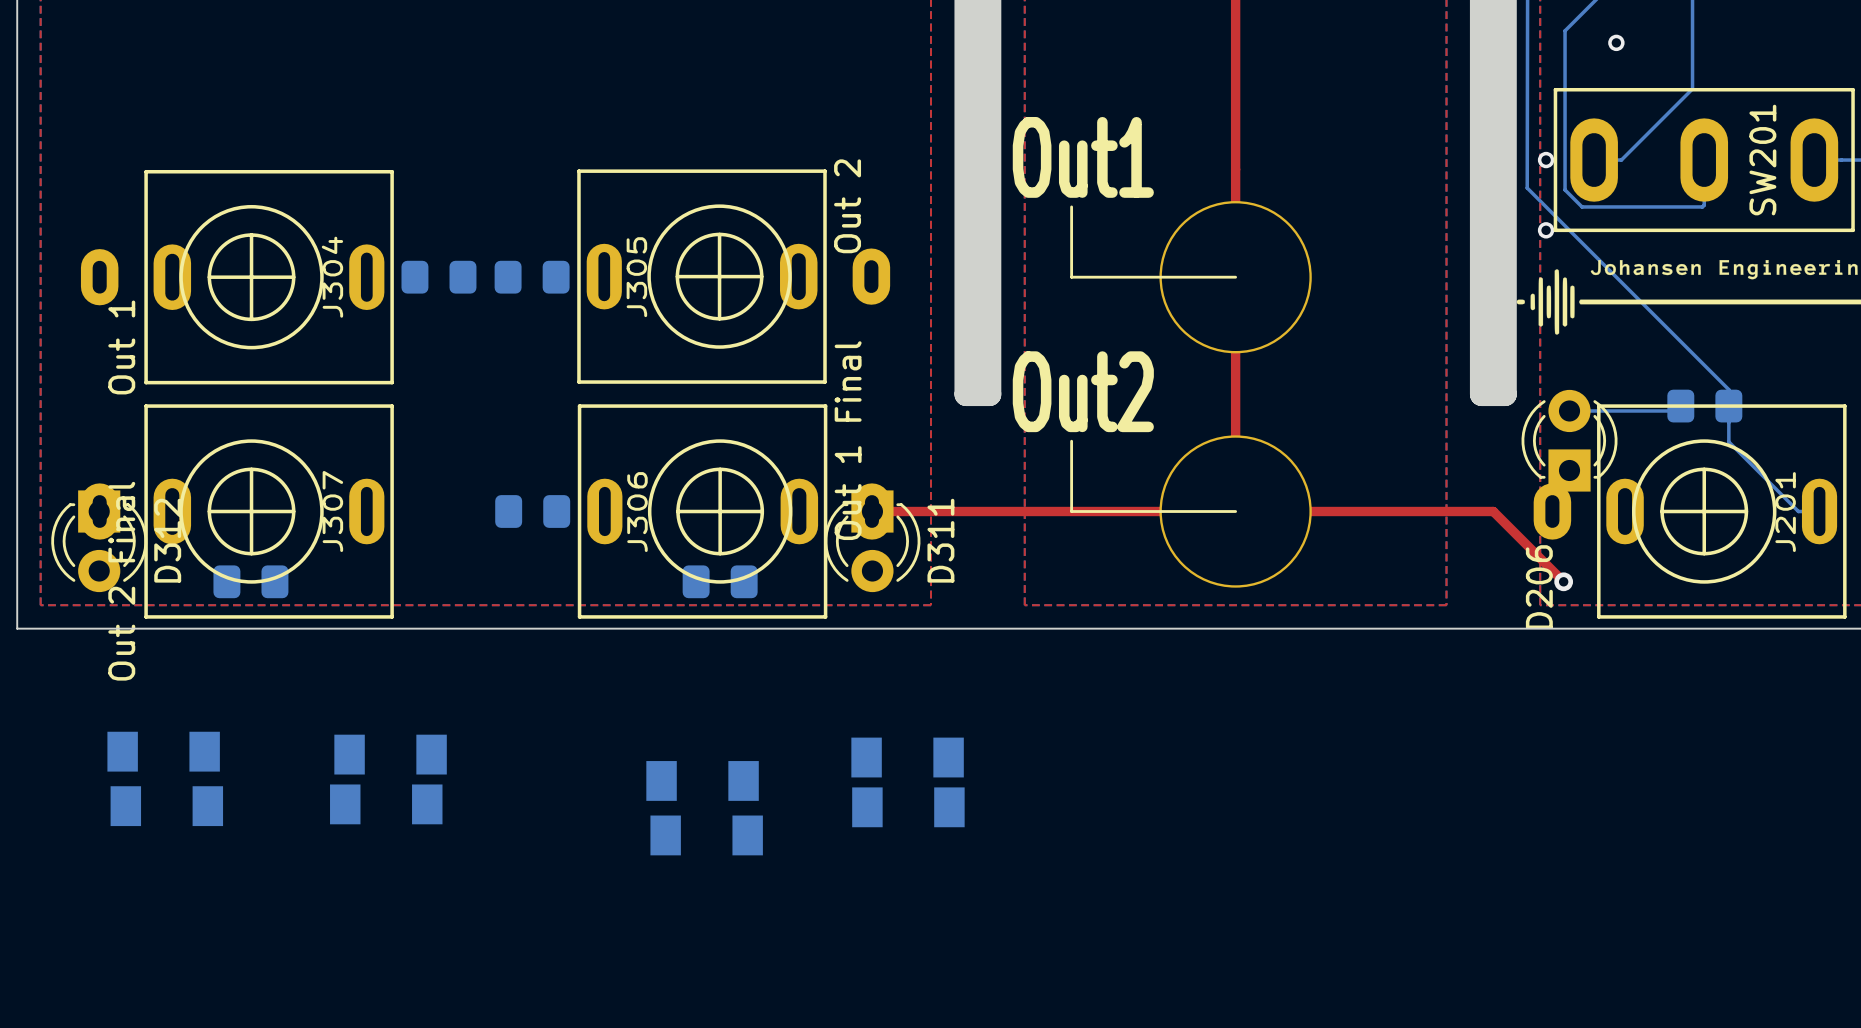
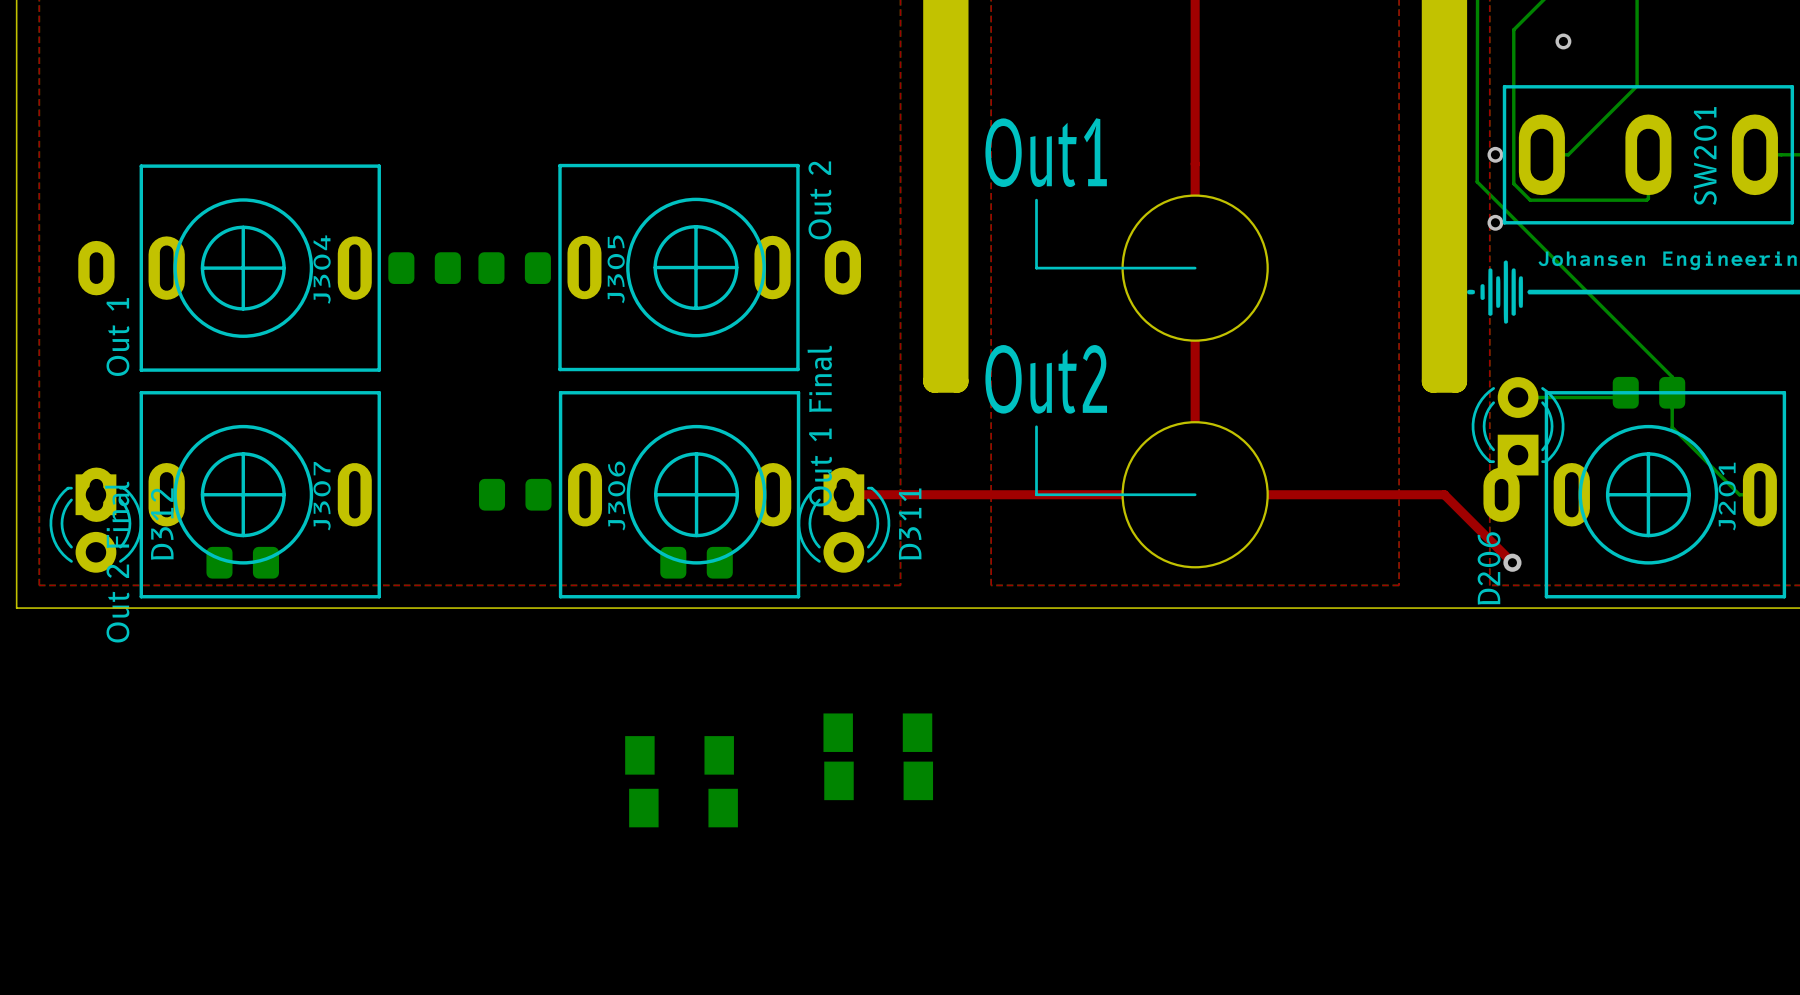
part: (163, 751) -> none
part: (390, 754) -> none
part: (386, 804) -> none
part: (166, 806) -> none

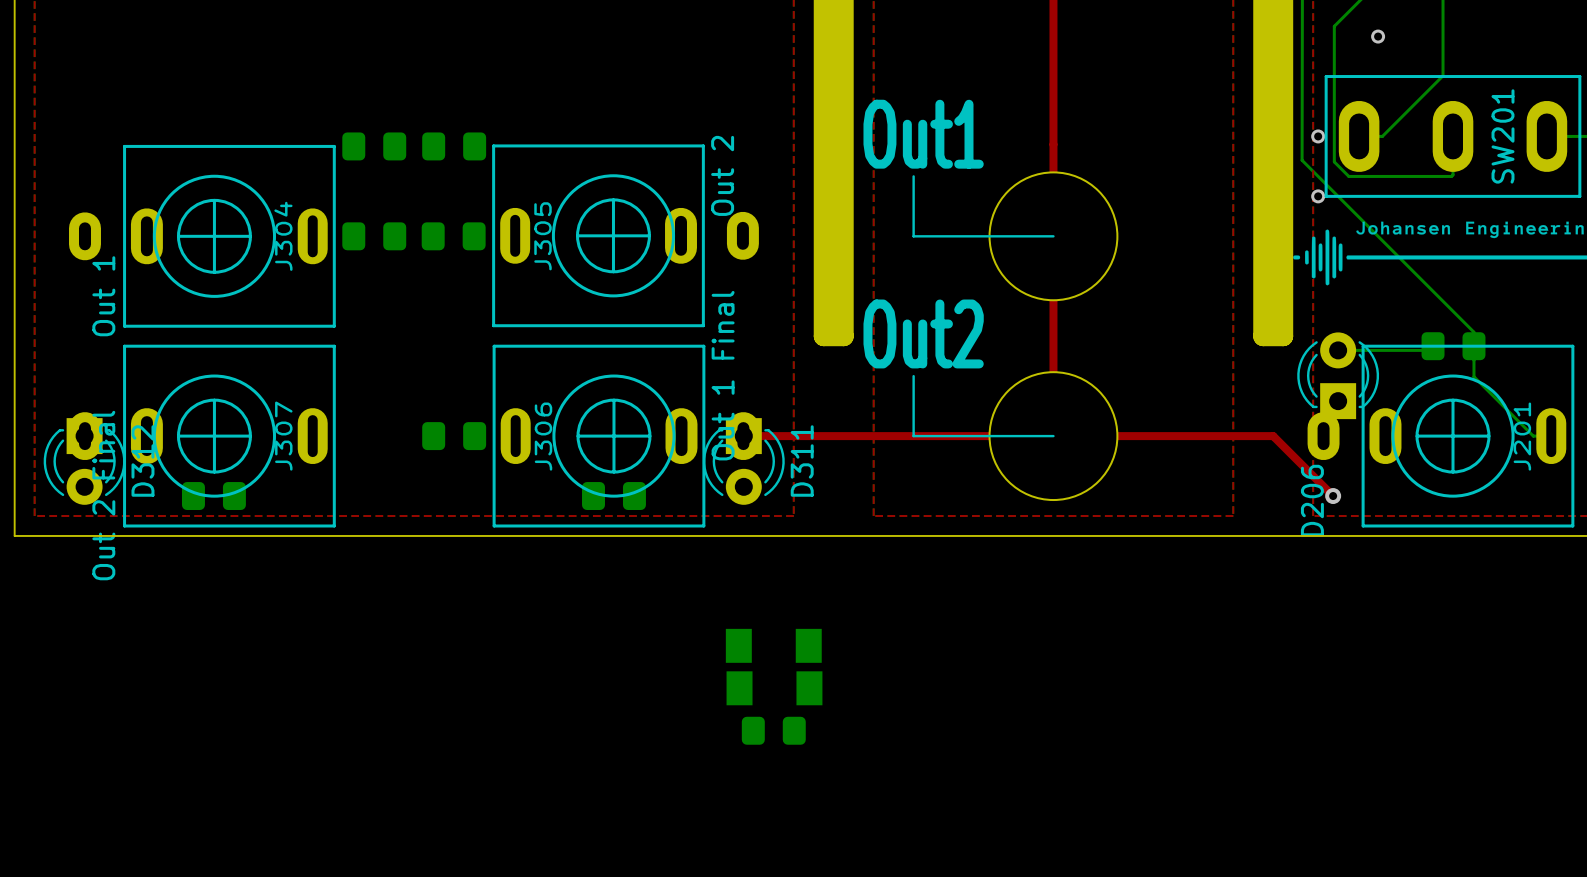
part: none -> (374, 146)
part: none -> (454, 146)
part: (679, 755) -> none
part: (683, 808) -> none
part: none -> (773, 730)

